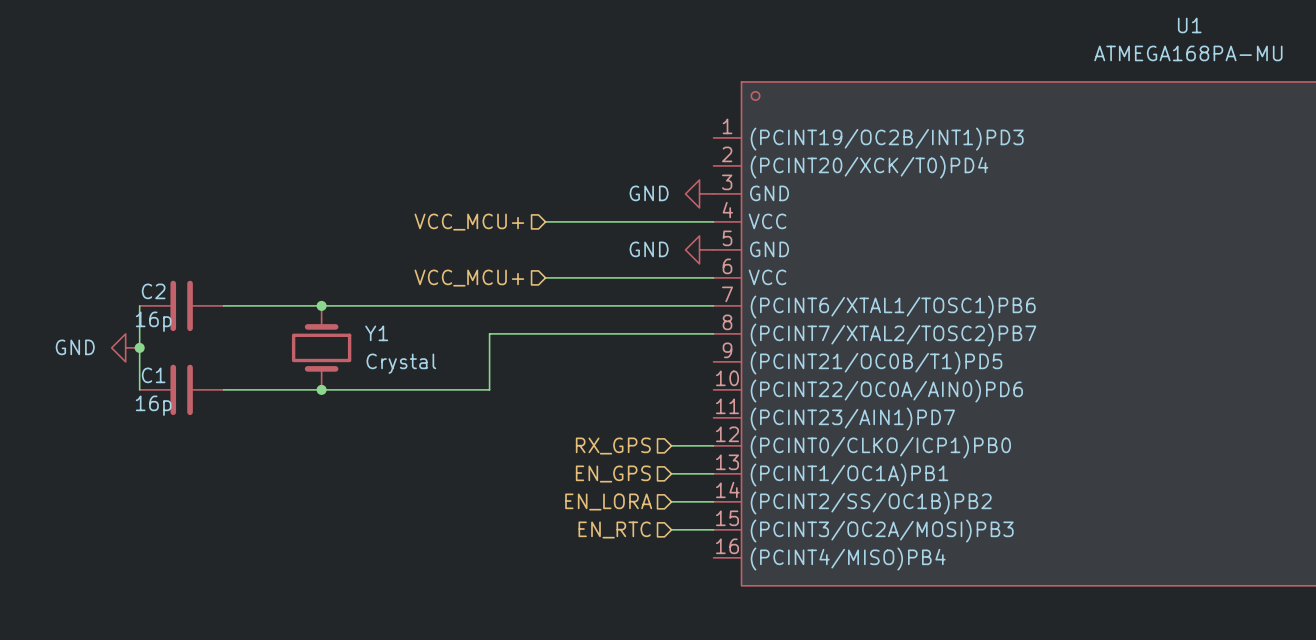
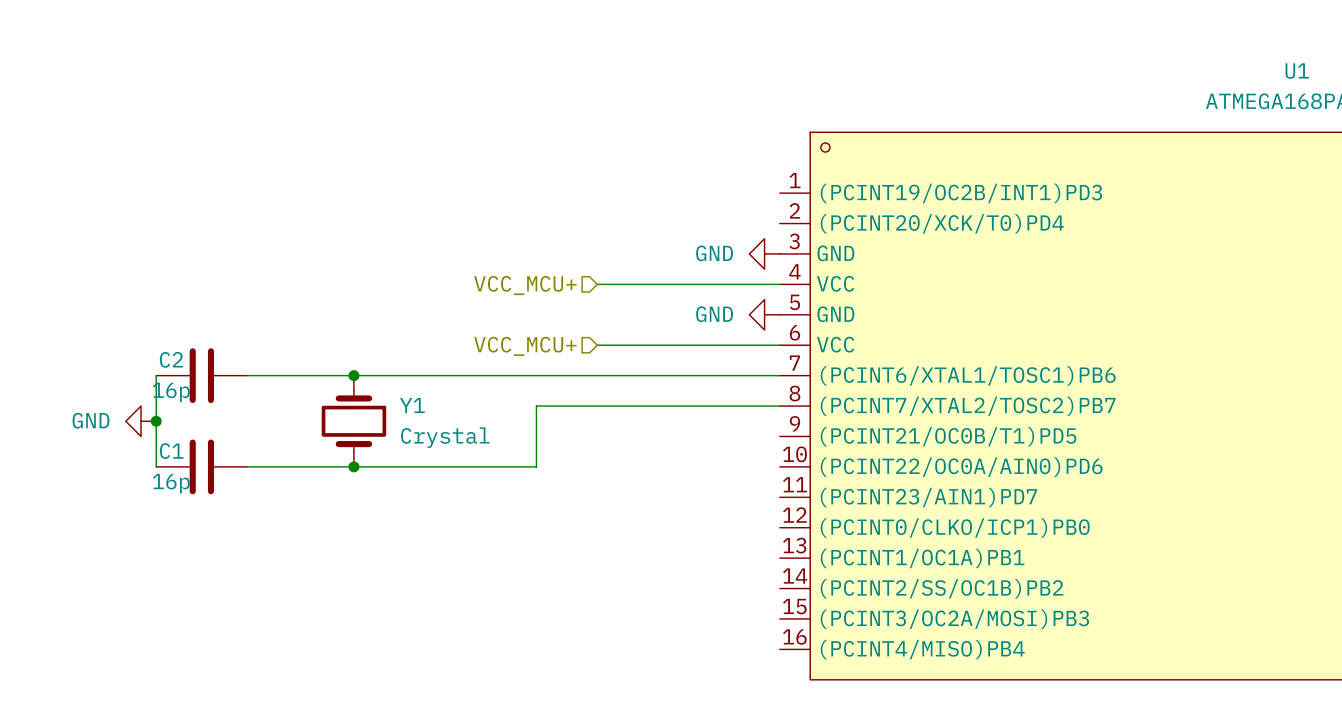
wire: (671, 445) (713, 445) -> none
hierarchical label: RX_GPS (613, 446) -> none
wire: (671, 473) (713, 473) -> none
hierarchical label: EN_GPS (613, 474) -> none
wire: (671, 501) (713, 501) -> none
hierarchical label: EN_LORA (608, 502) -> none
hierarchical label: EN_RTC (614, 529) -> none
wire: (671, 529) (713, 529) -> none

